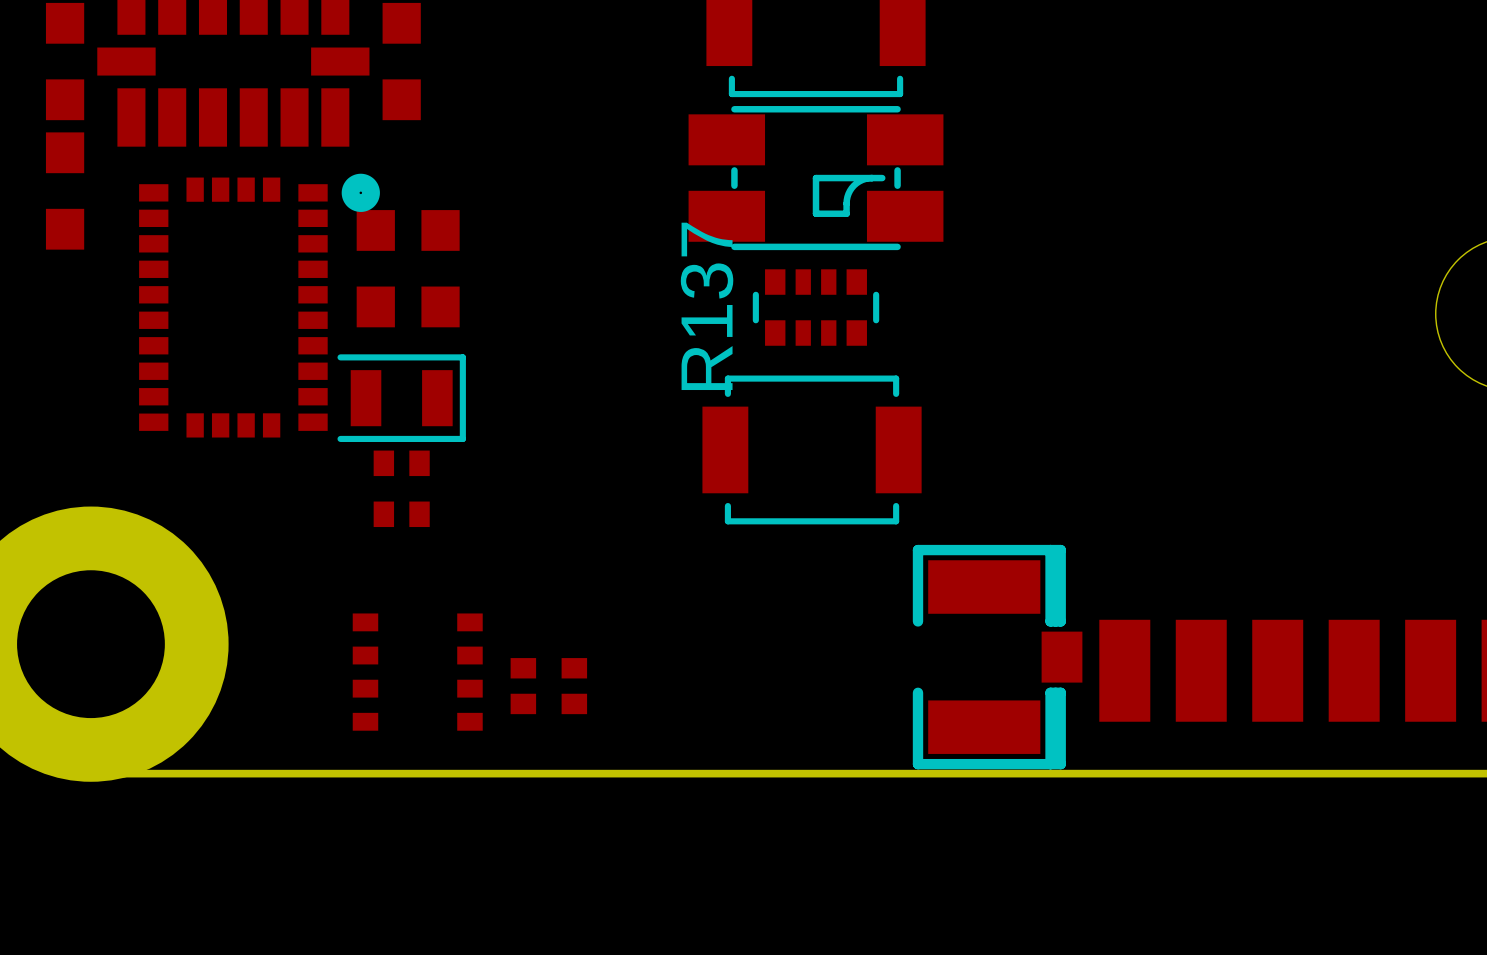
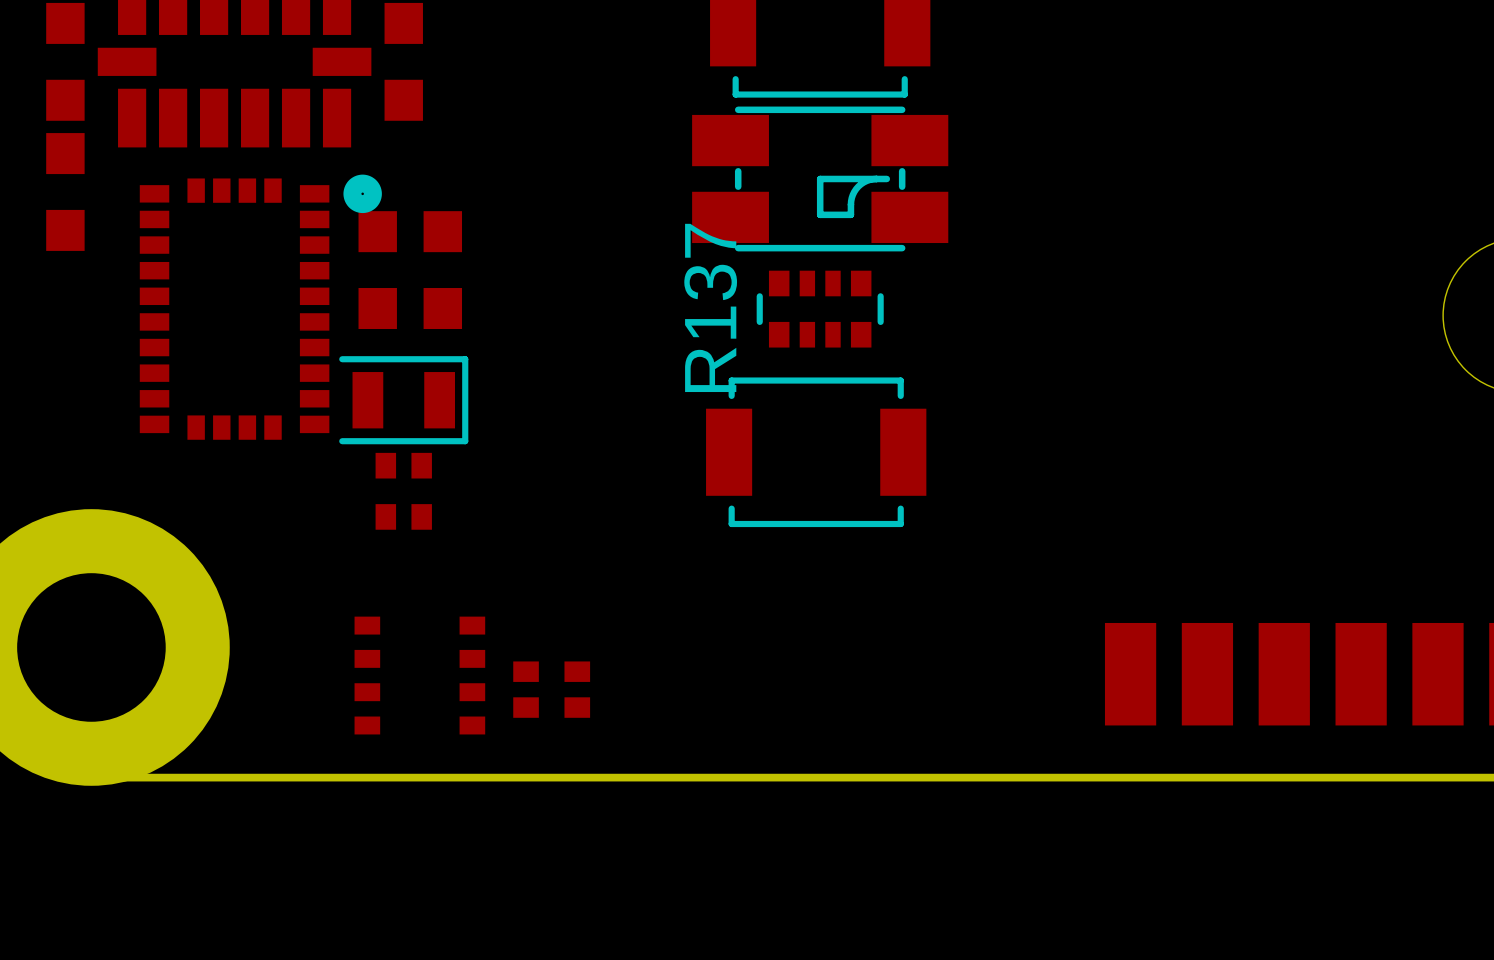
part: (997, 657) -> none

